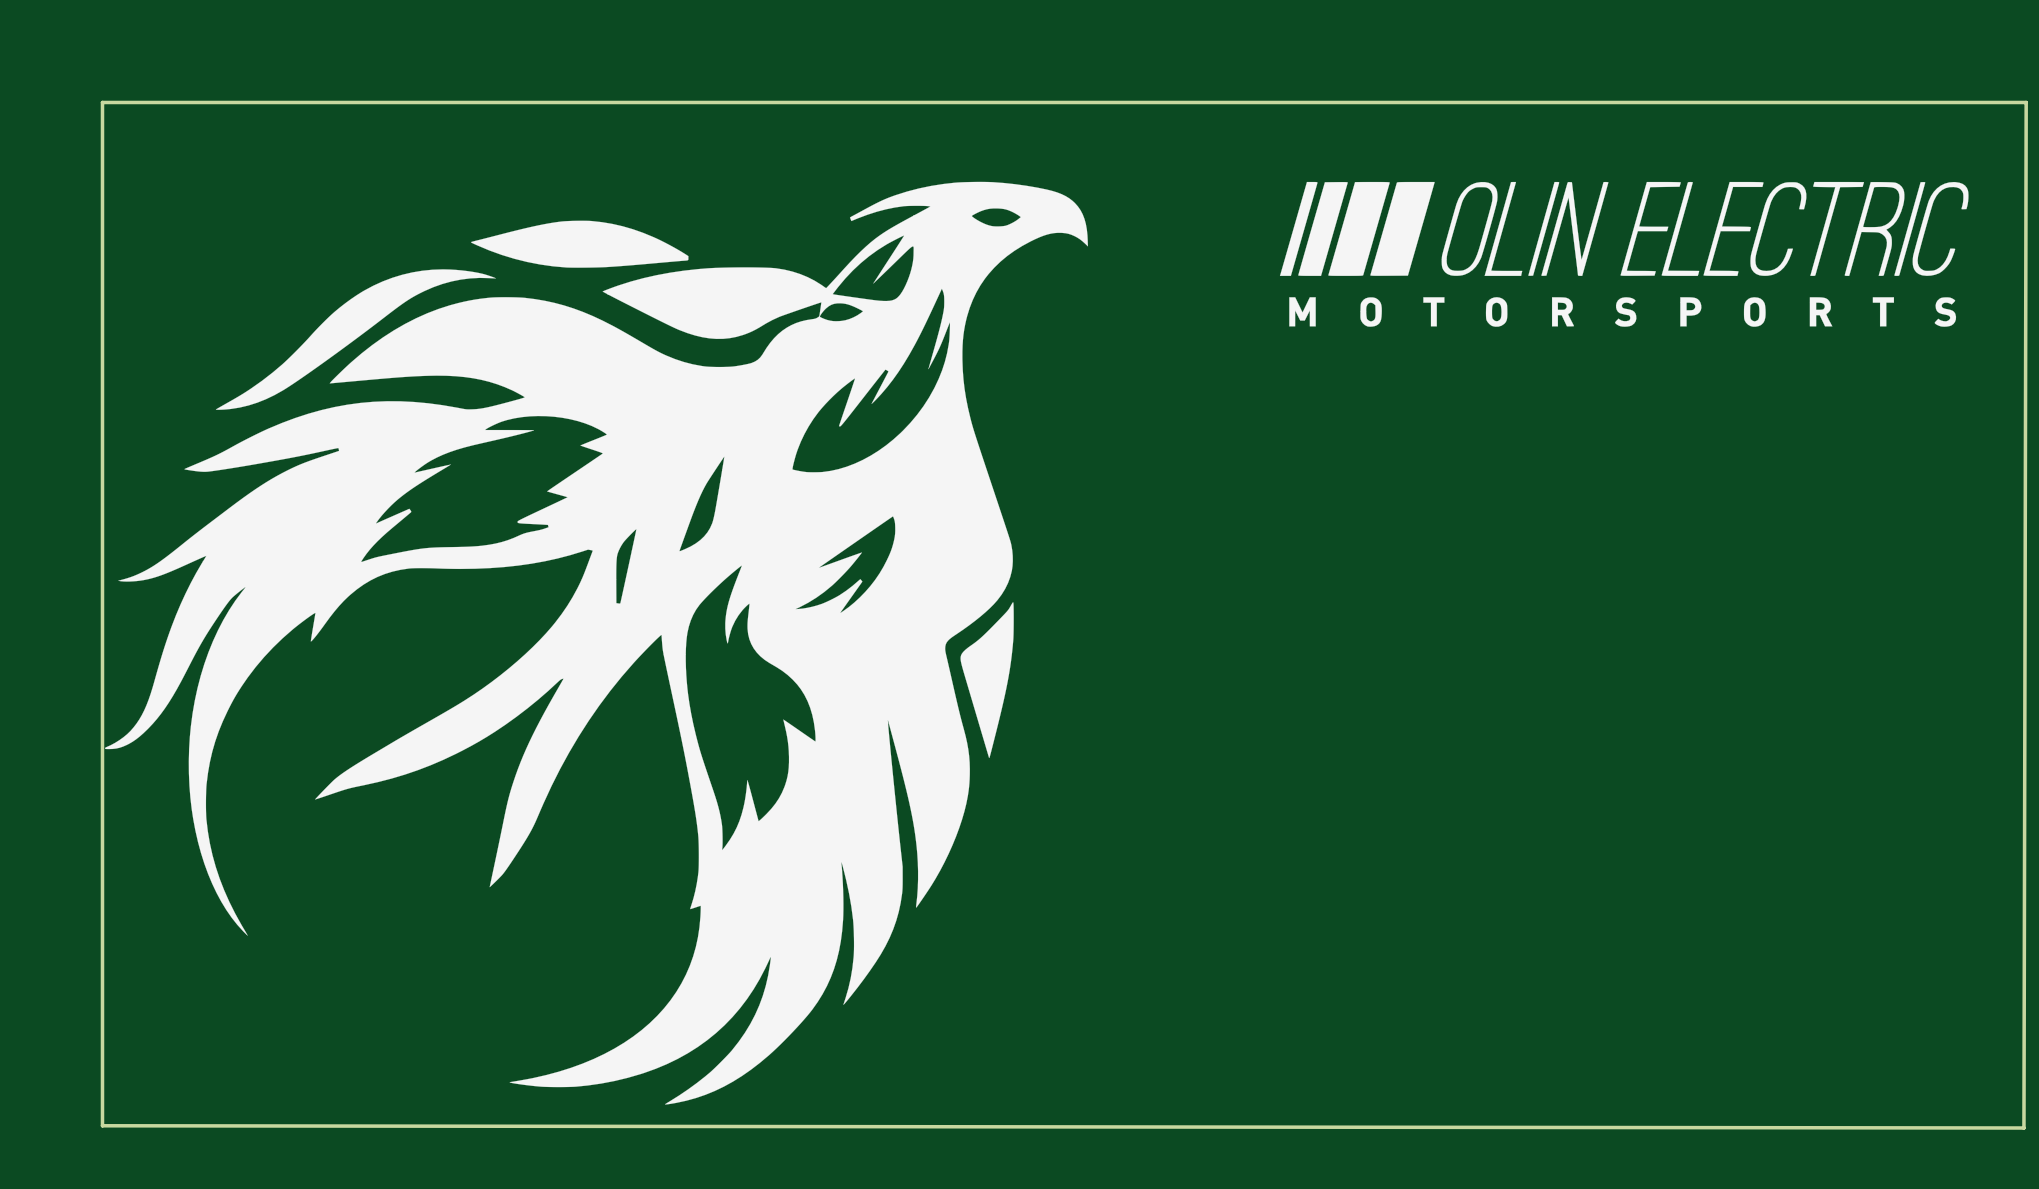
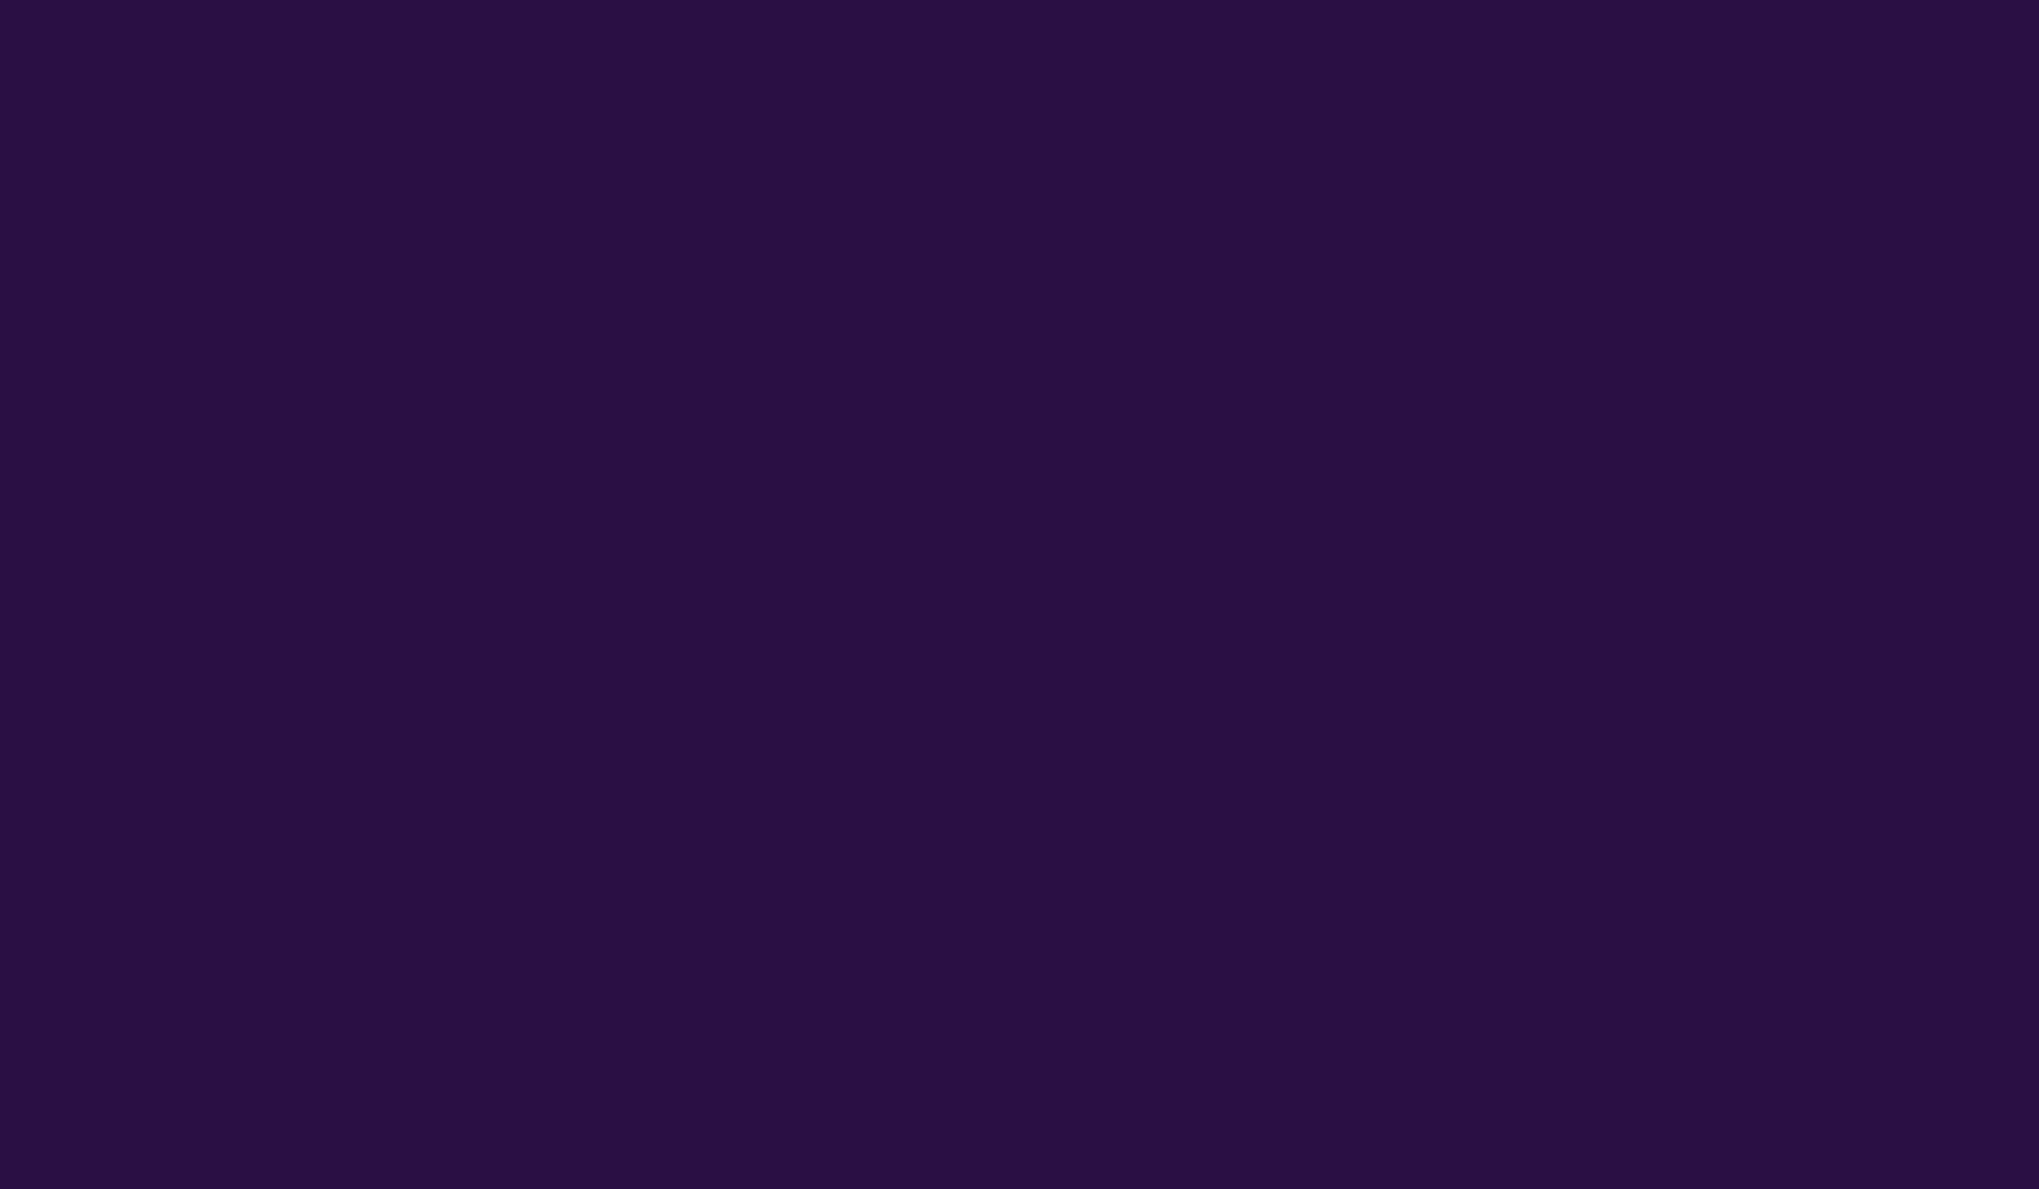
board edge: (2026, 102) (2023, 1128) (102, 1125) (102, 102) (2026, 102) -> none
drawing: [104, 181, 1088, 1105] -> none
drawing: [1279, 181, 1969, 327] -> none

